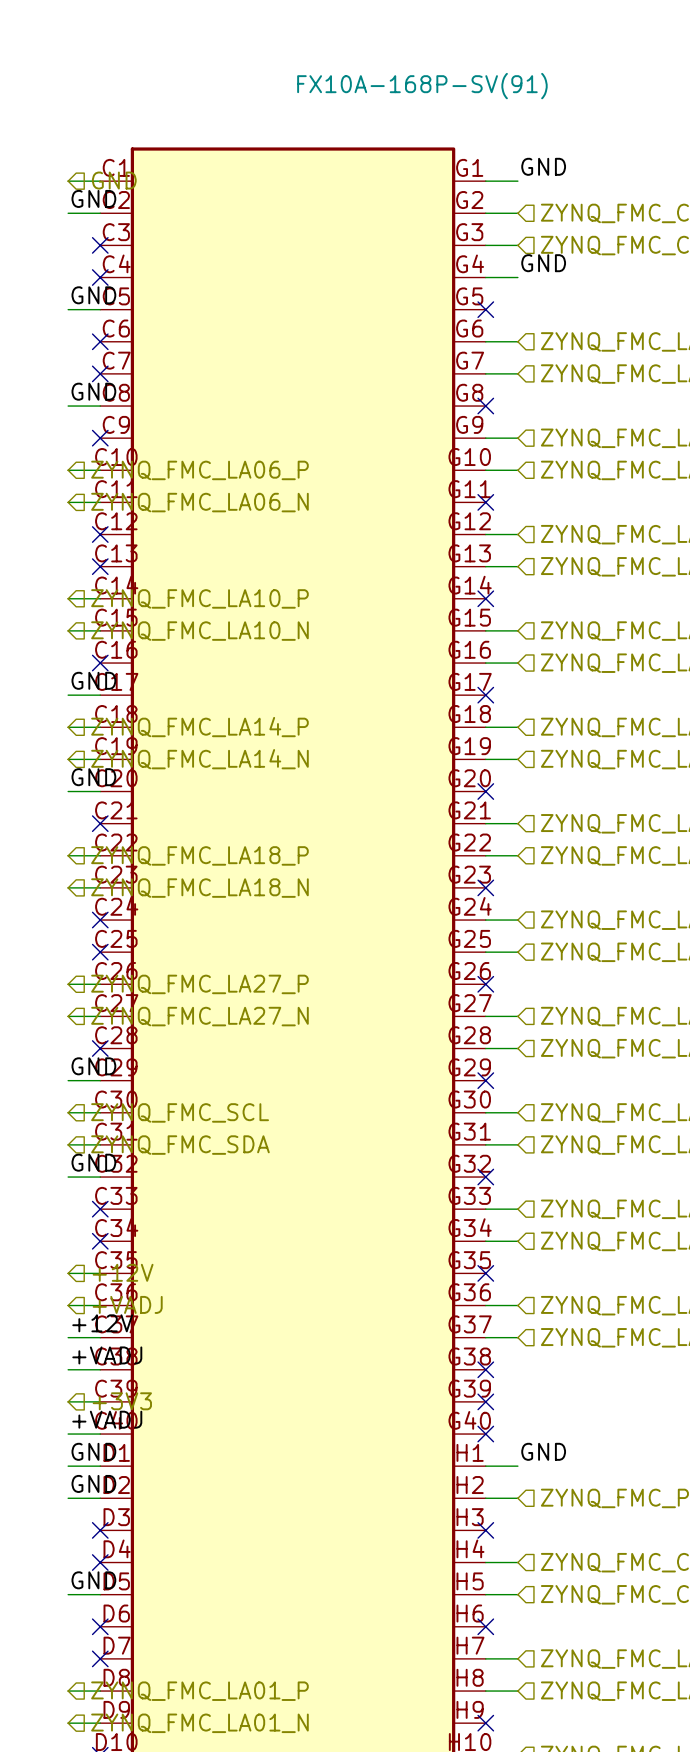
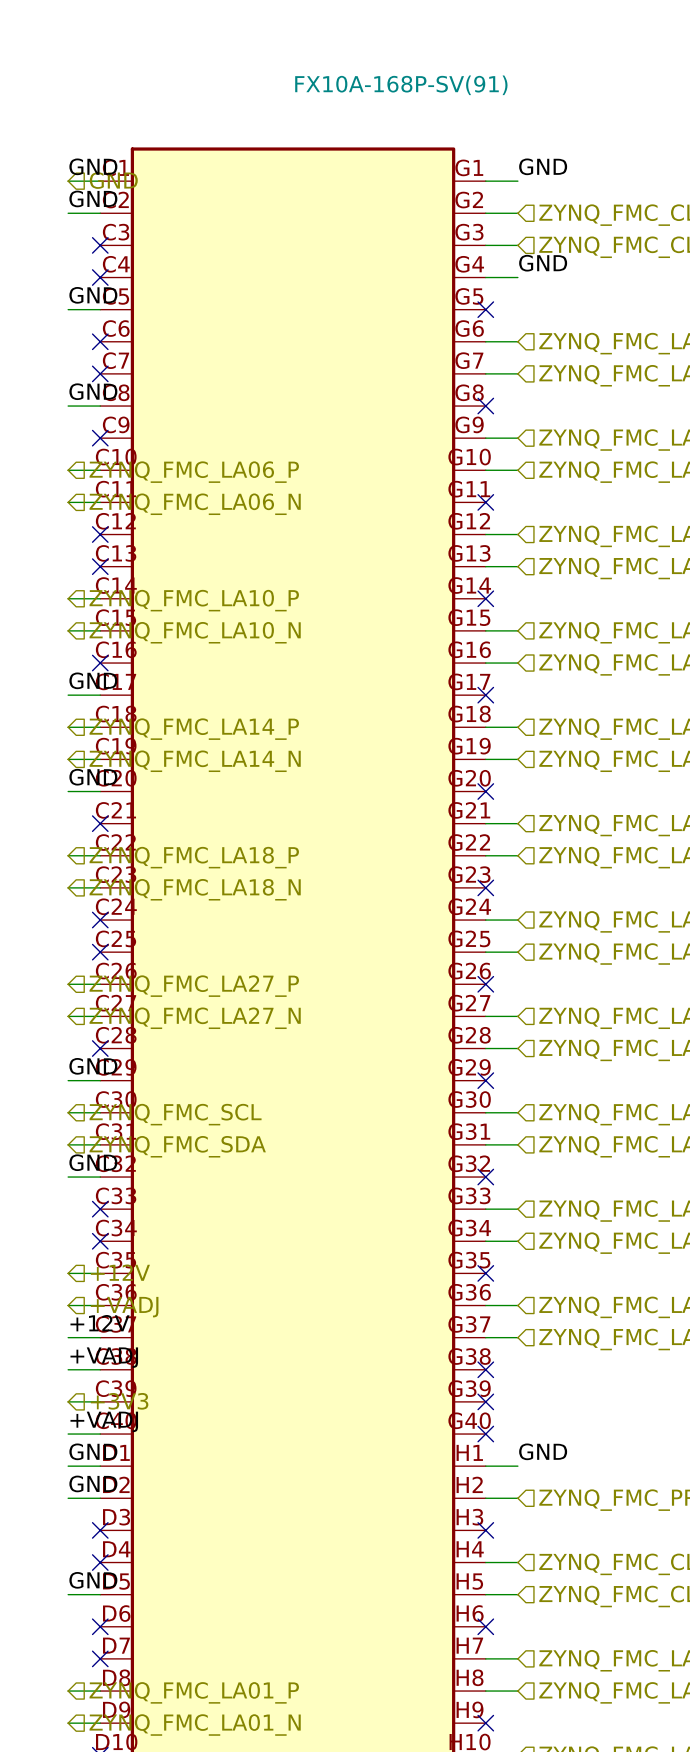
label: none -> GND (93, 166)

